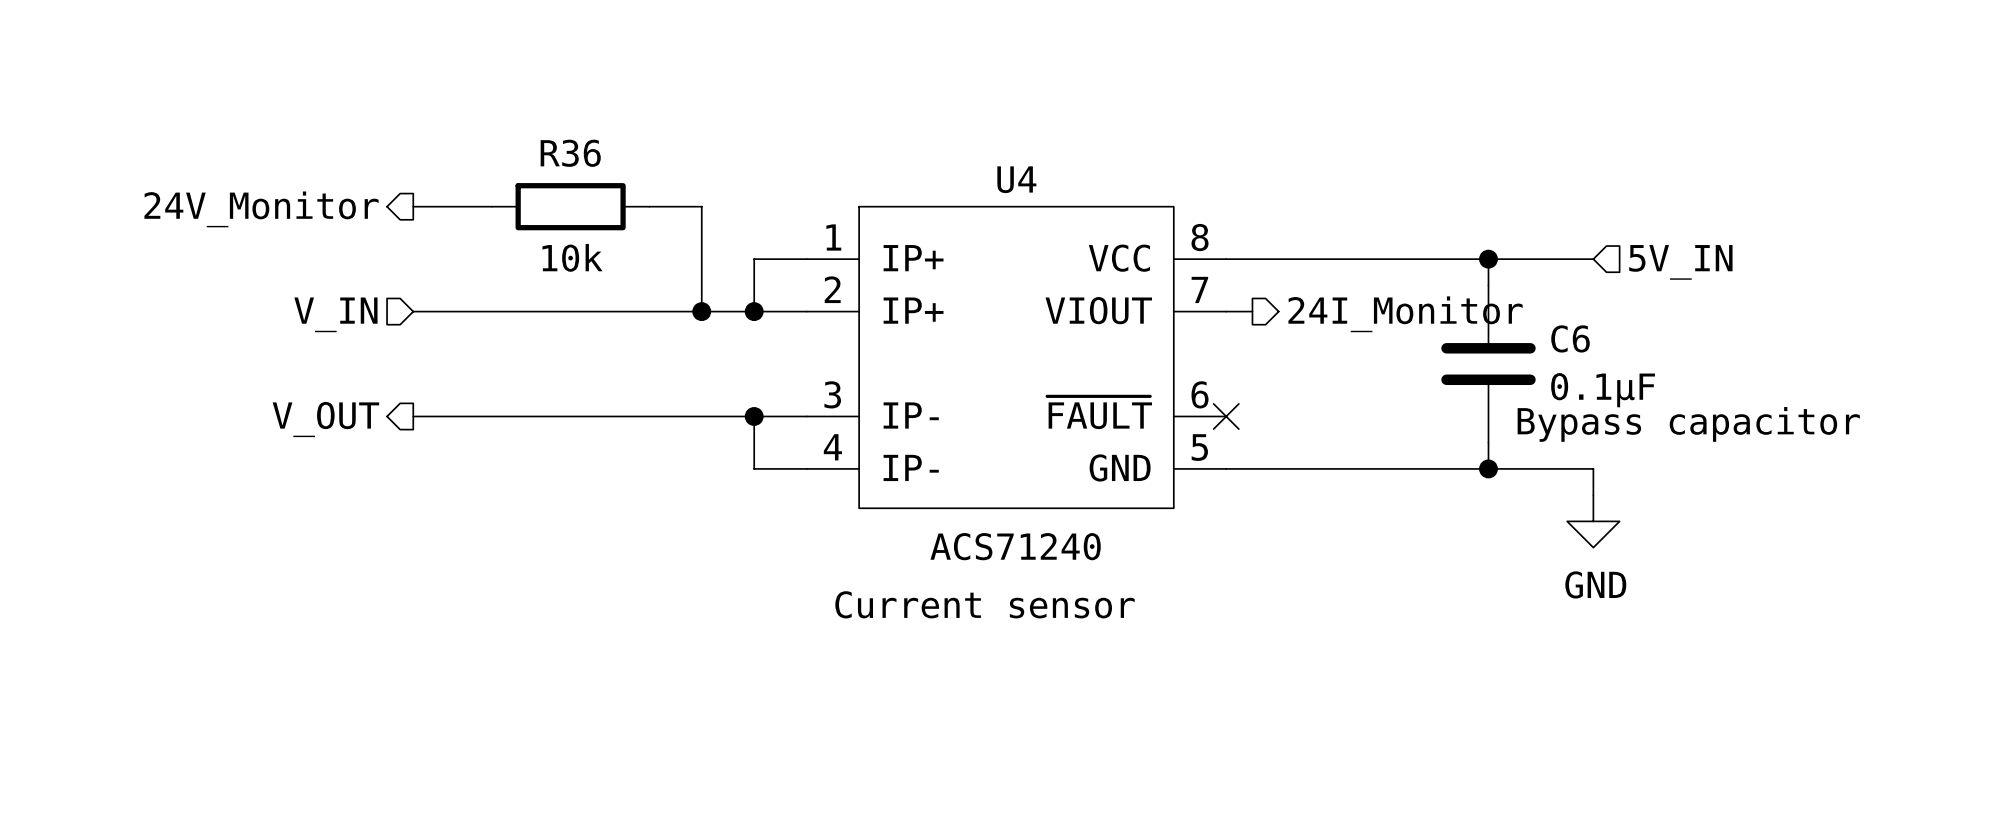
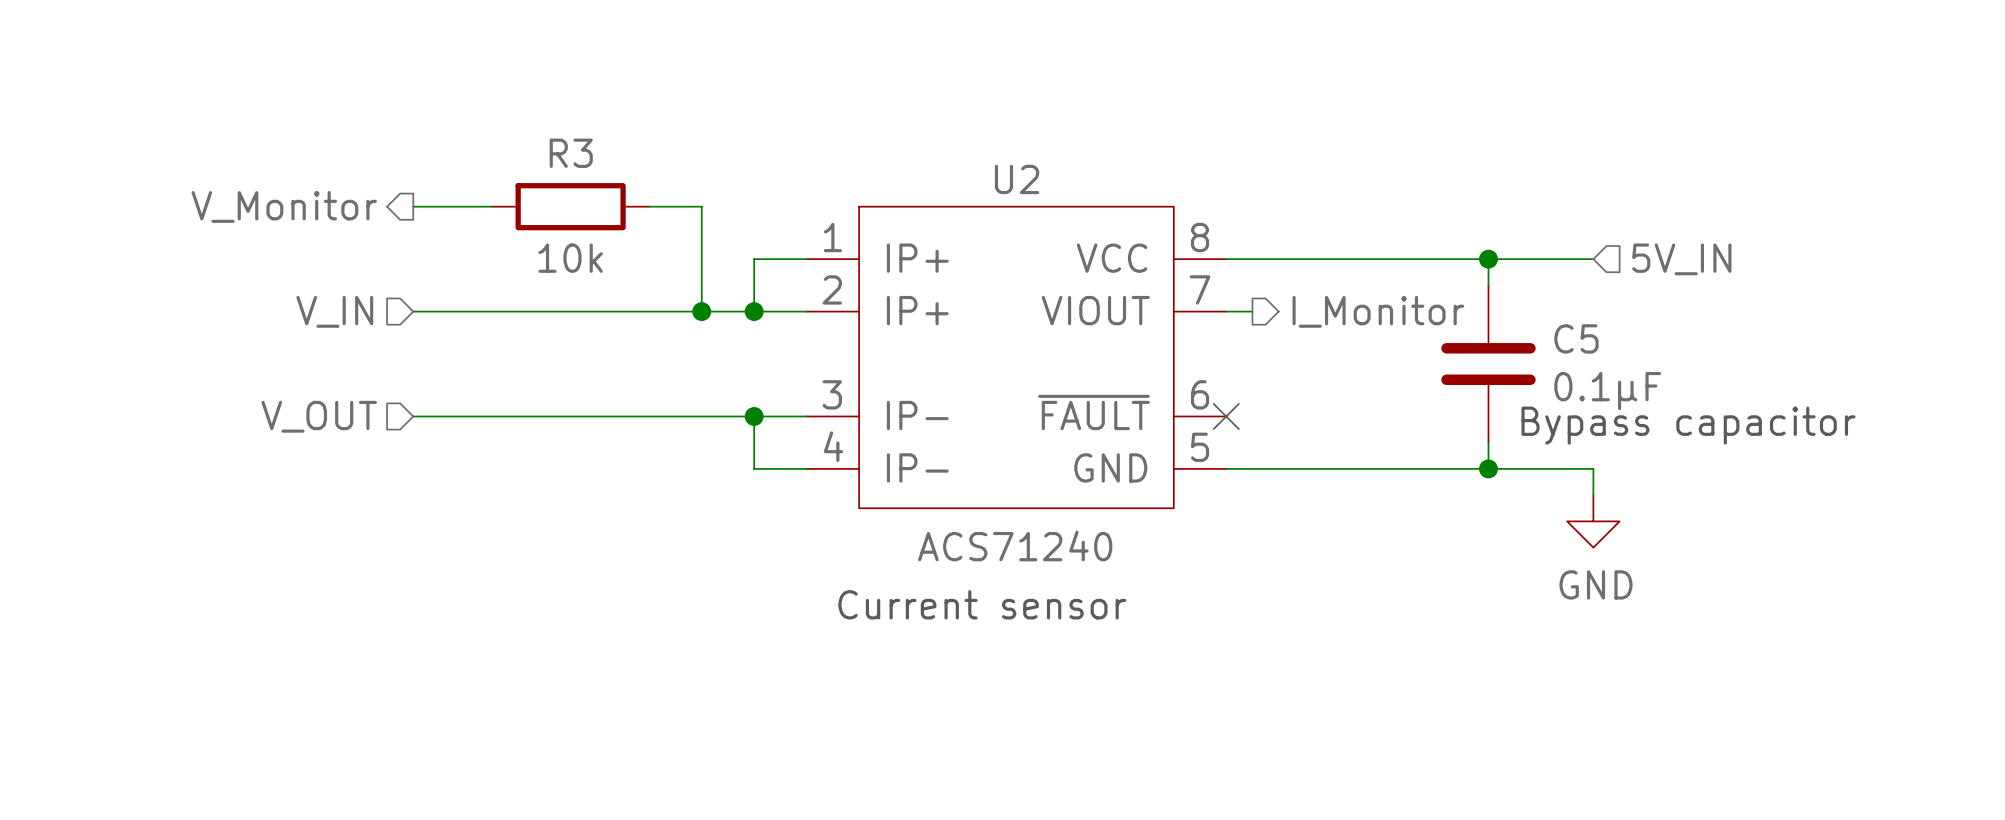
R36 name: R36 (570, 153) -> R3 (571, 153)
U4 name: U4 (1016, 179) -> U2 (1017, 179)
hierarchical label: 24V_Monitor (261, 209) -> V_Monitor (284, 206)
hierarchical label: 24I_Monitor (1405, 314) -> I_Monitor (1378, 311)
C6 name: C6 (1570, 338) -> C5 (1576, 338)
hierarchical label shape: output (325, 419) -> input (319, 416)

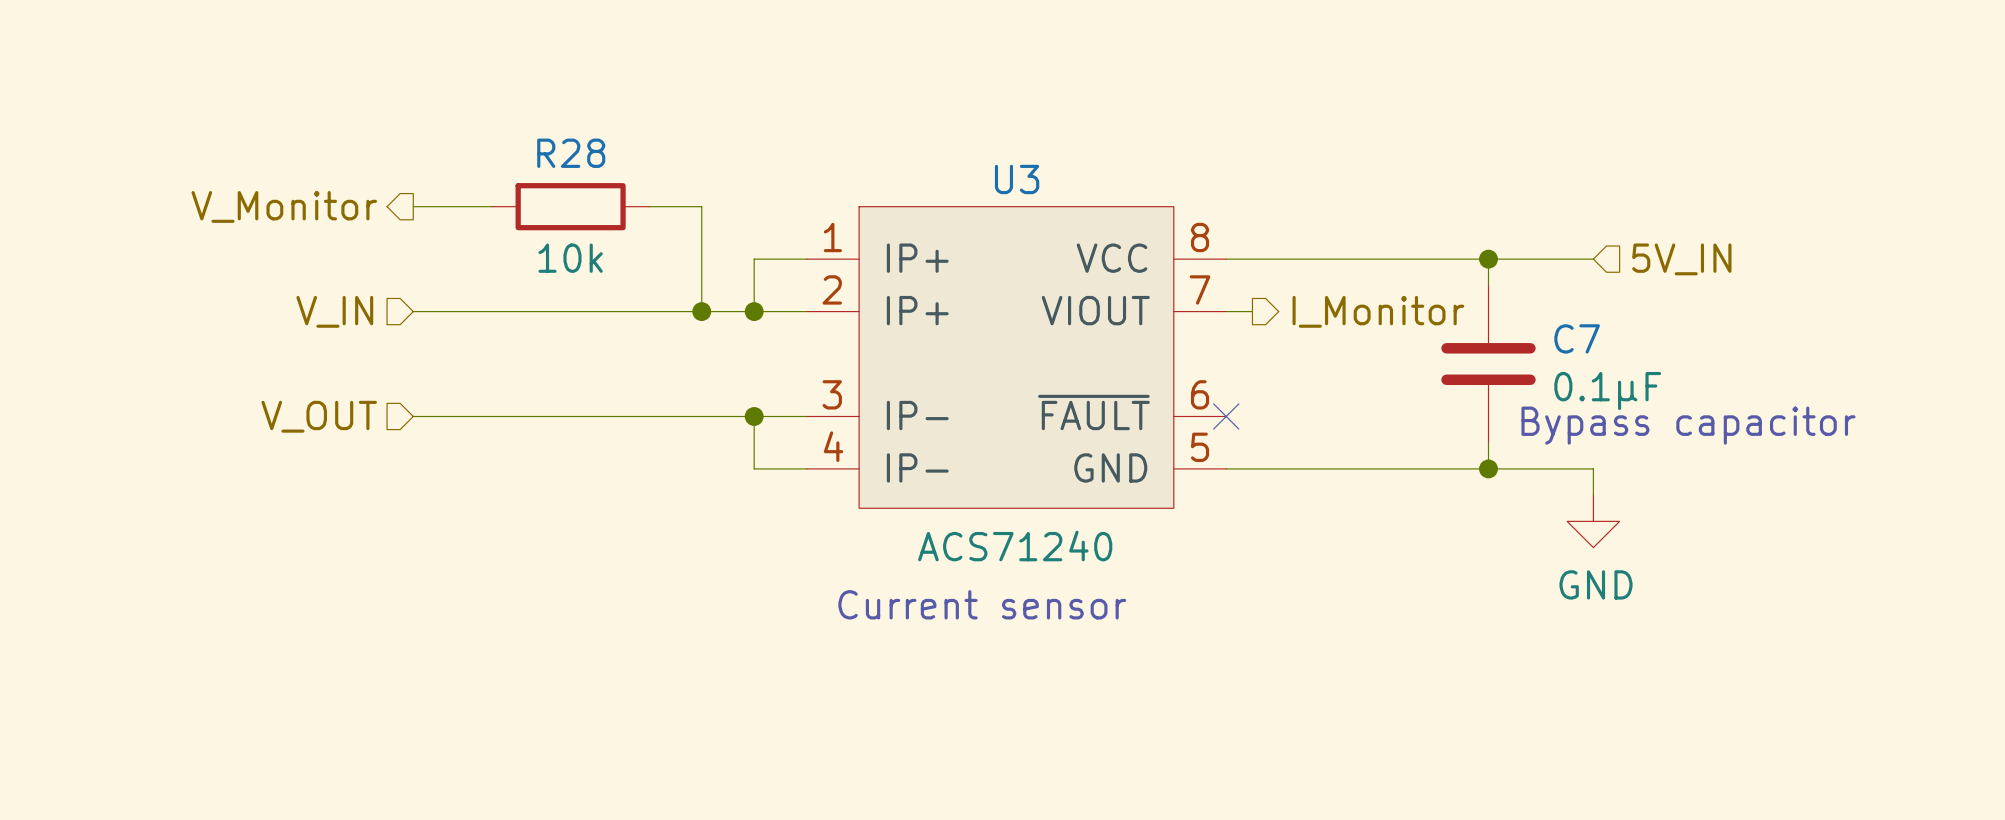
R3 name: R3 (571, 153) -> R28 (571, 153)
U2 name: U2 (1017, 179) -> U3 (1017, 179)
C5 name: C5 (1576, 338) -> C7 (1577, 338)

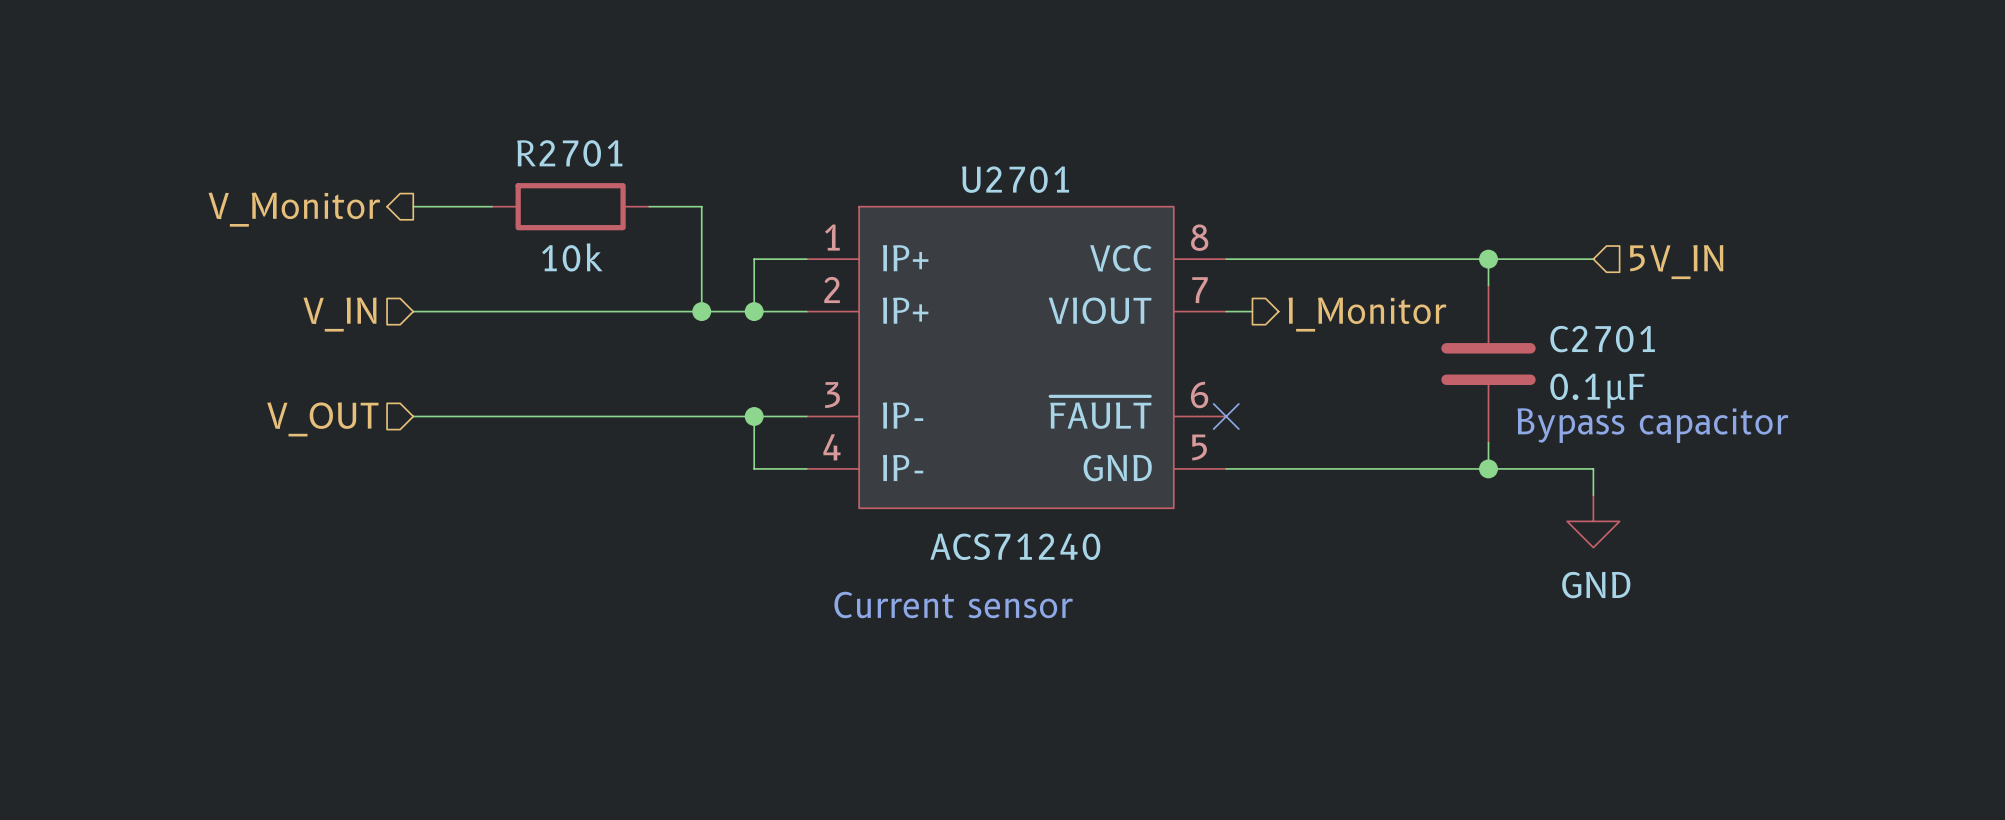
R28 name: R28 (571, 153) -> R2701 (569, 153)
U3 name: U3 (1017, 179) -> U2701 (1015, 179)
C7 name: C7 (1577, 338) -> C2701 (1602, 339)

